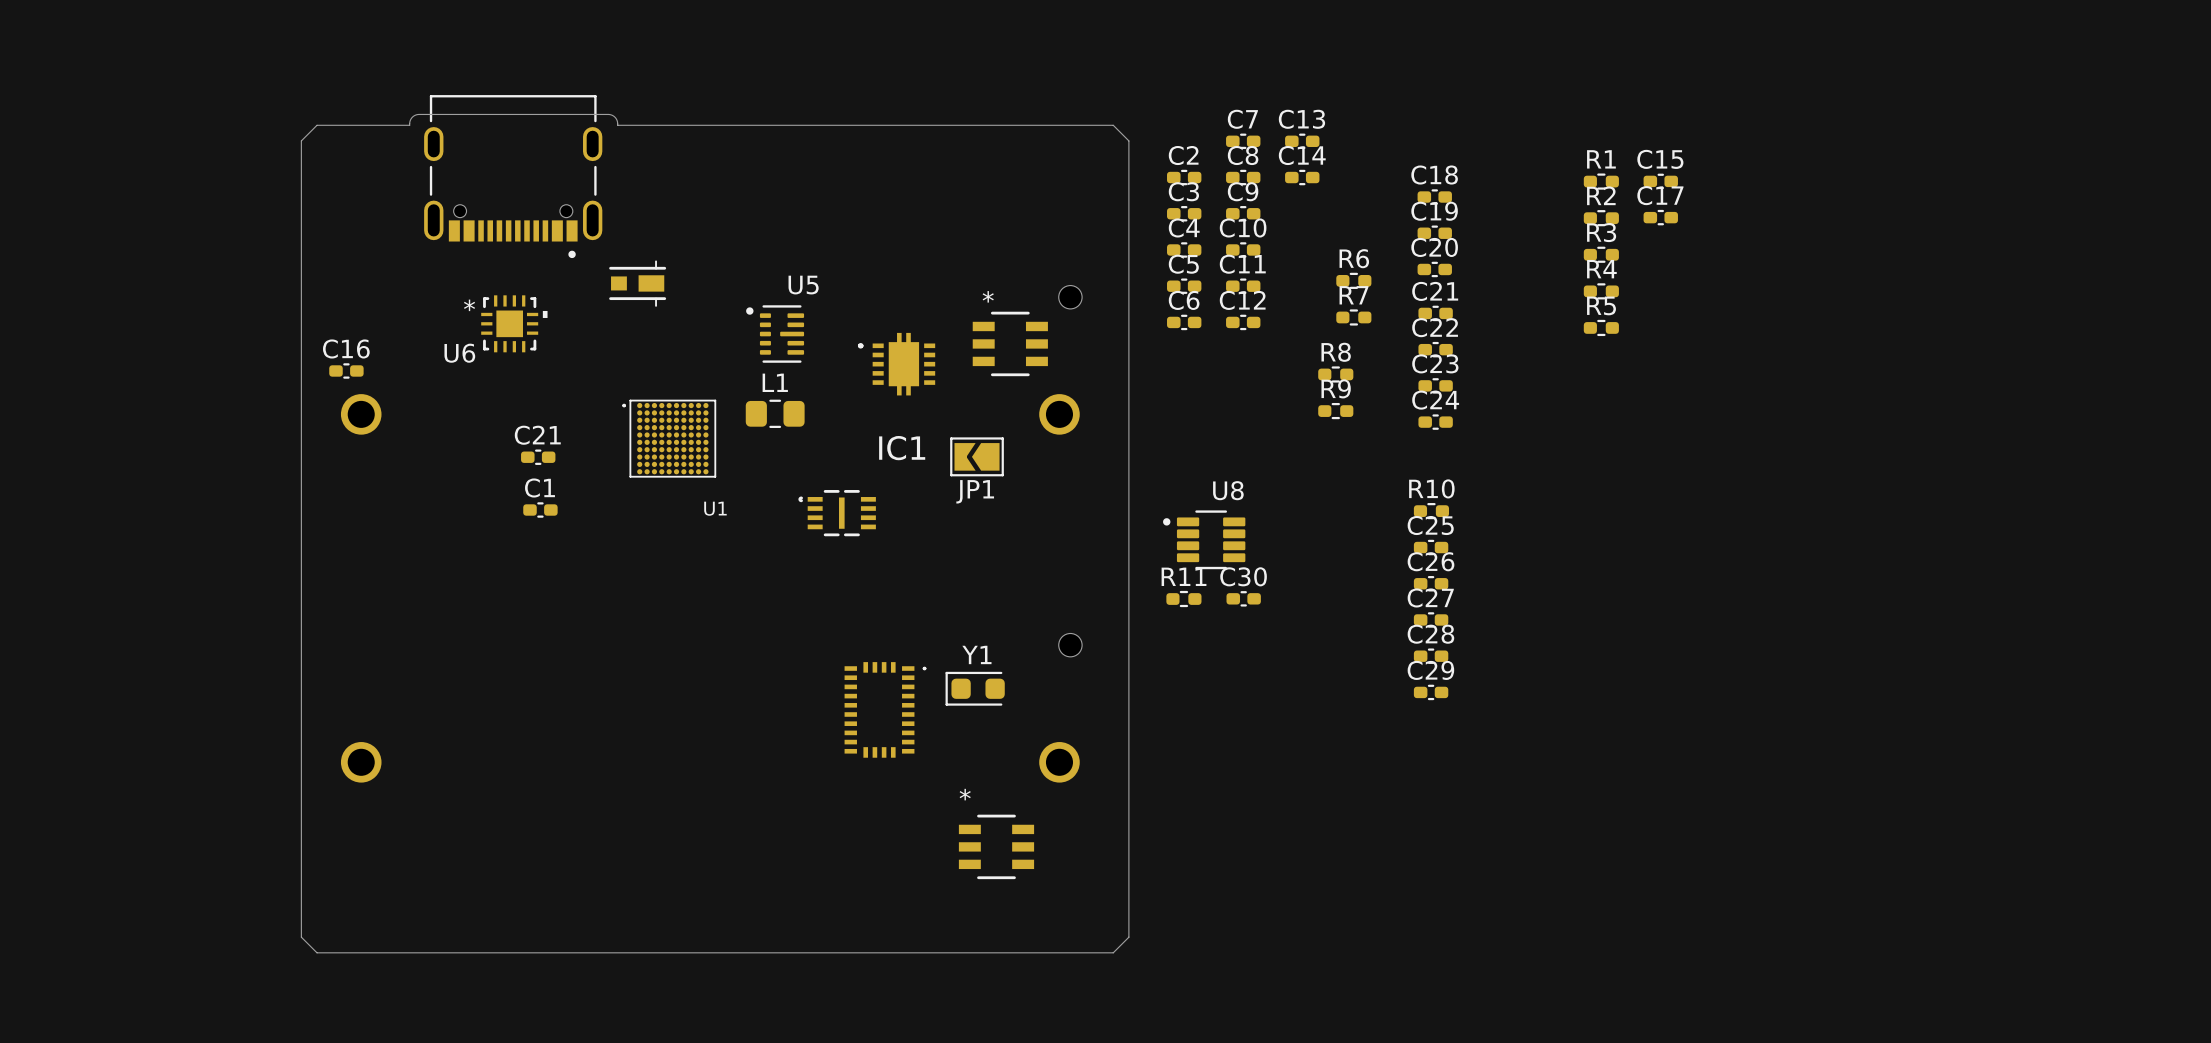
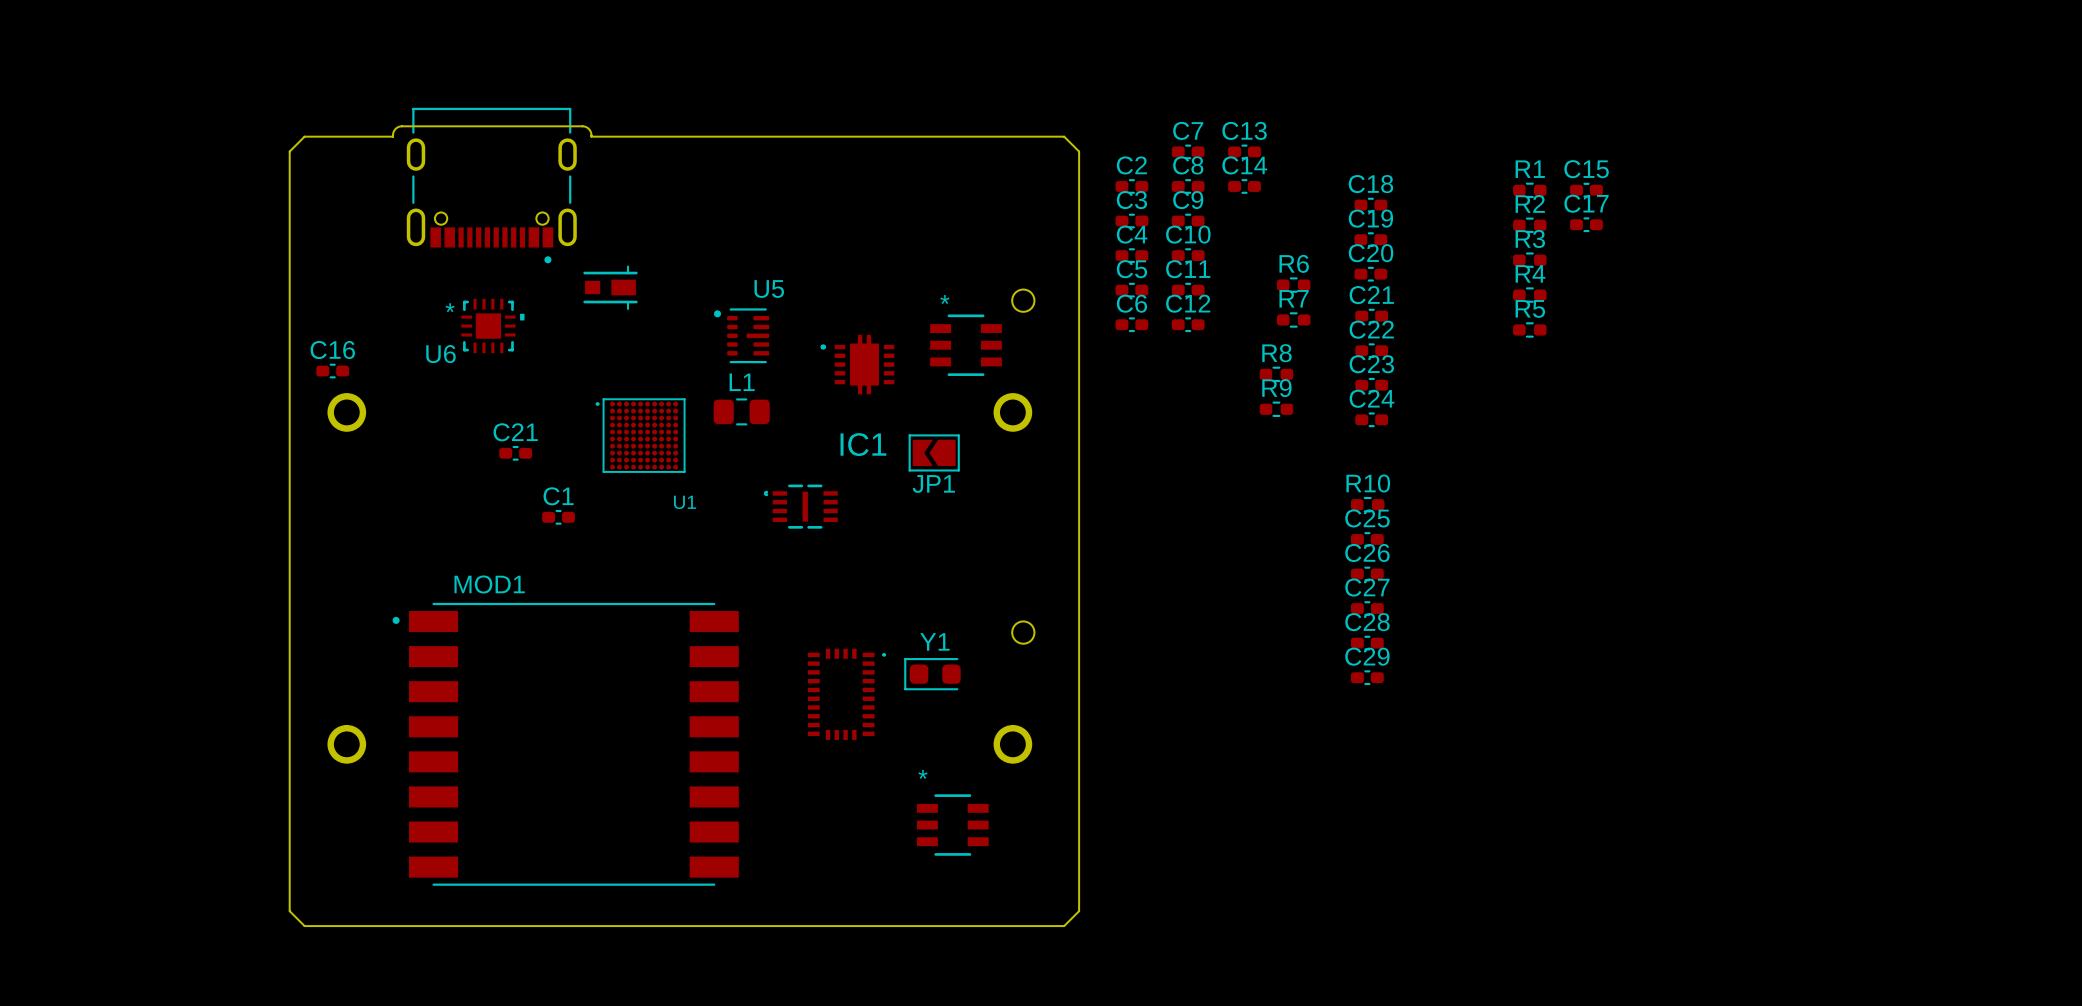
C1 position: (540, 510) -> (558, 517)
U8: (1204, 539) -> none
C30: (1243, 598) -> none
R11: (1183, 599) -> none
MOD1: none -> (565, 744)

